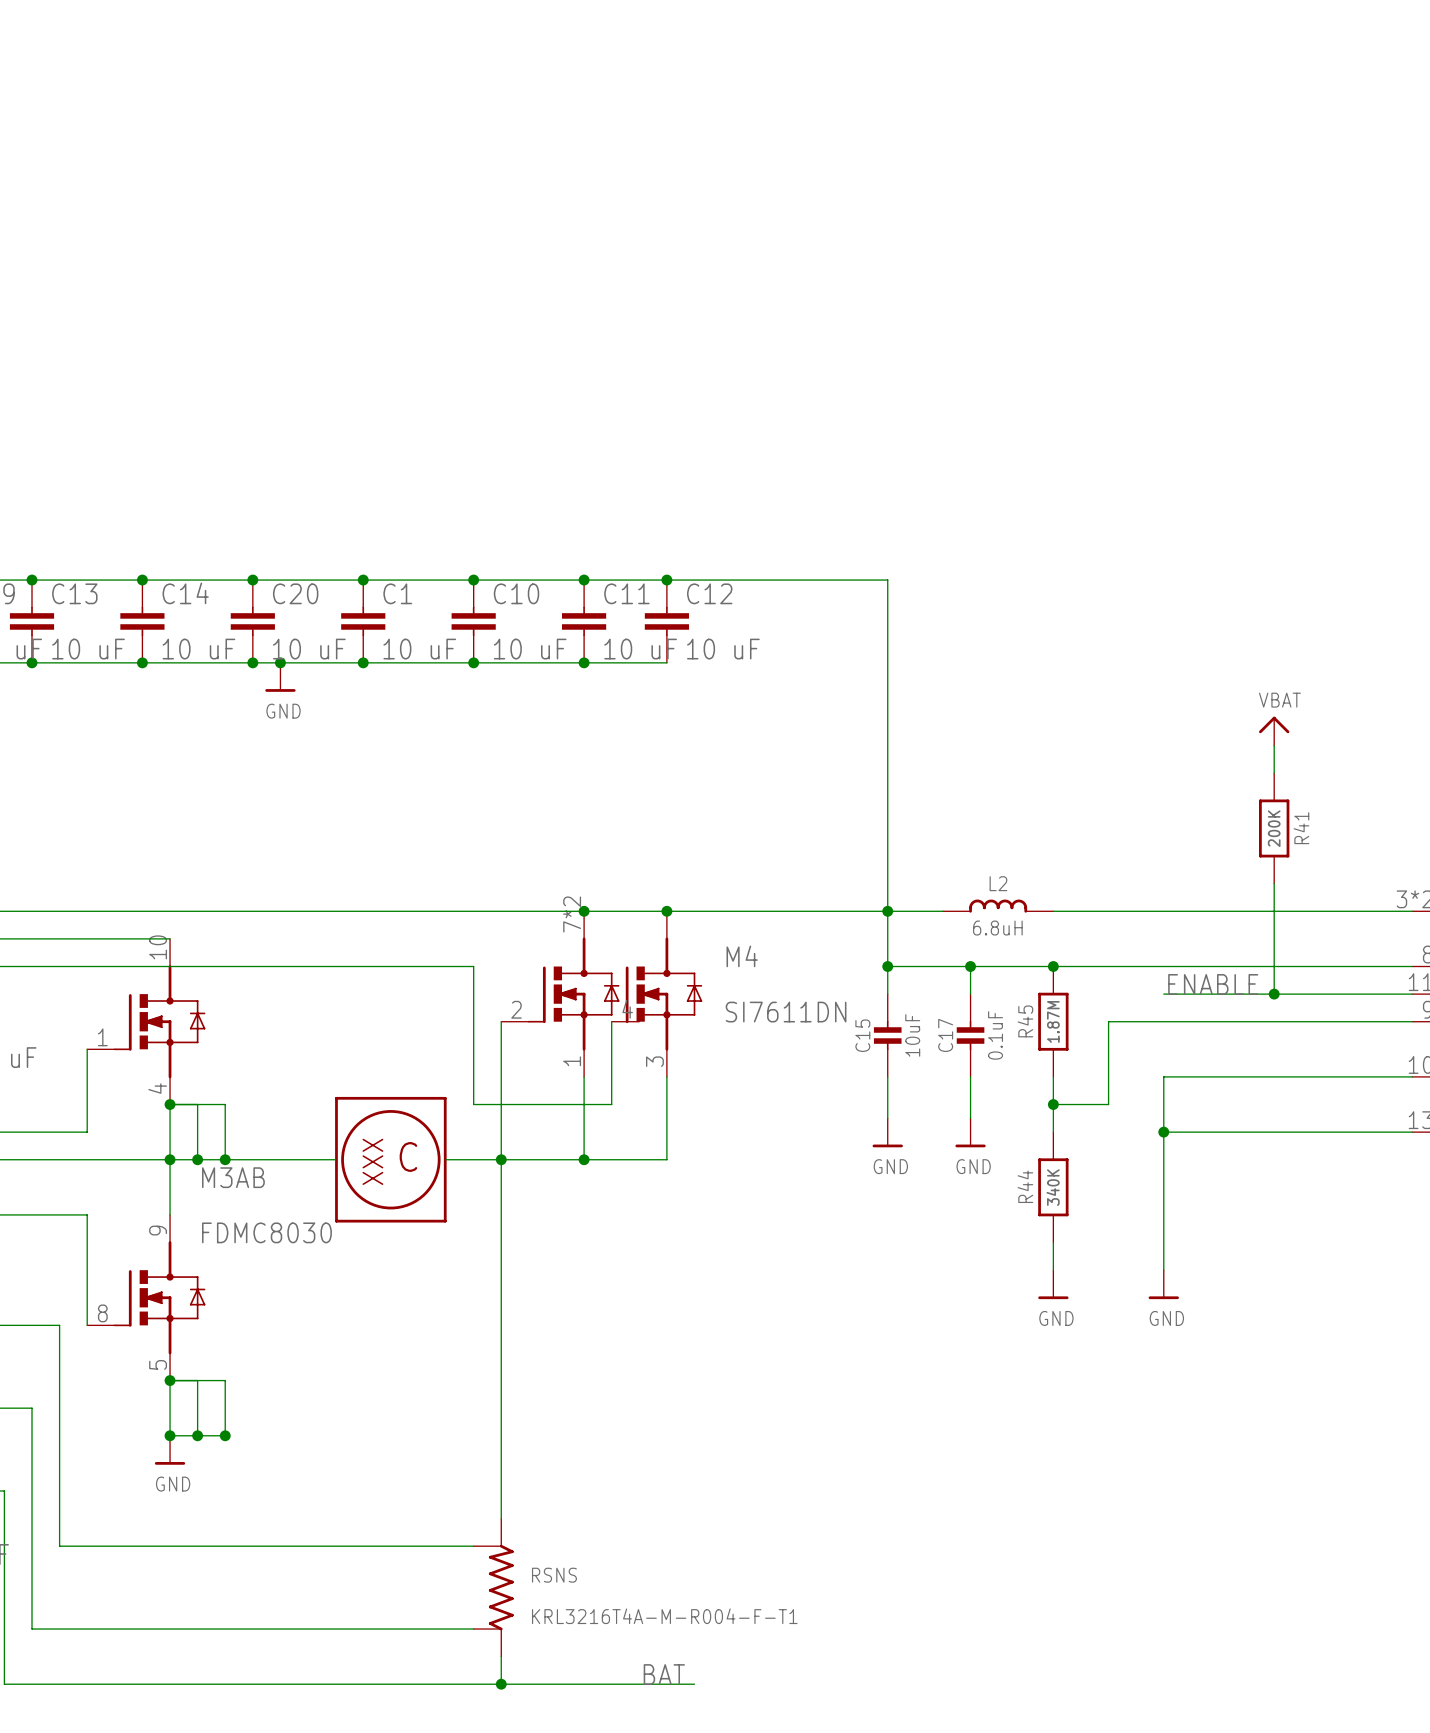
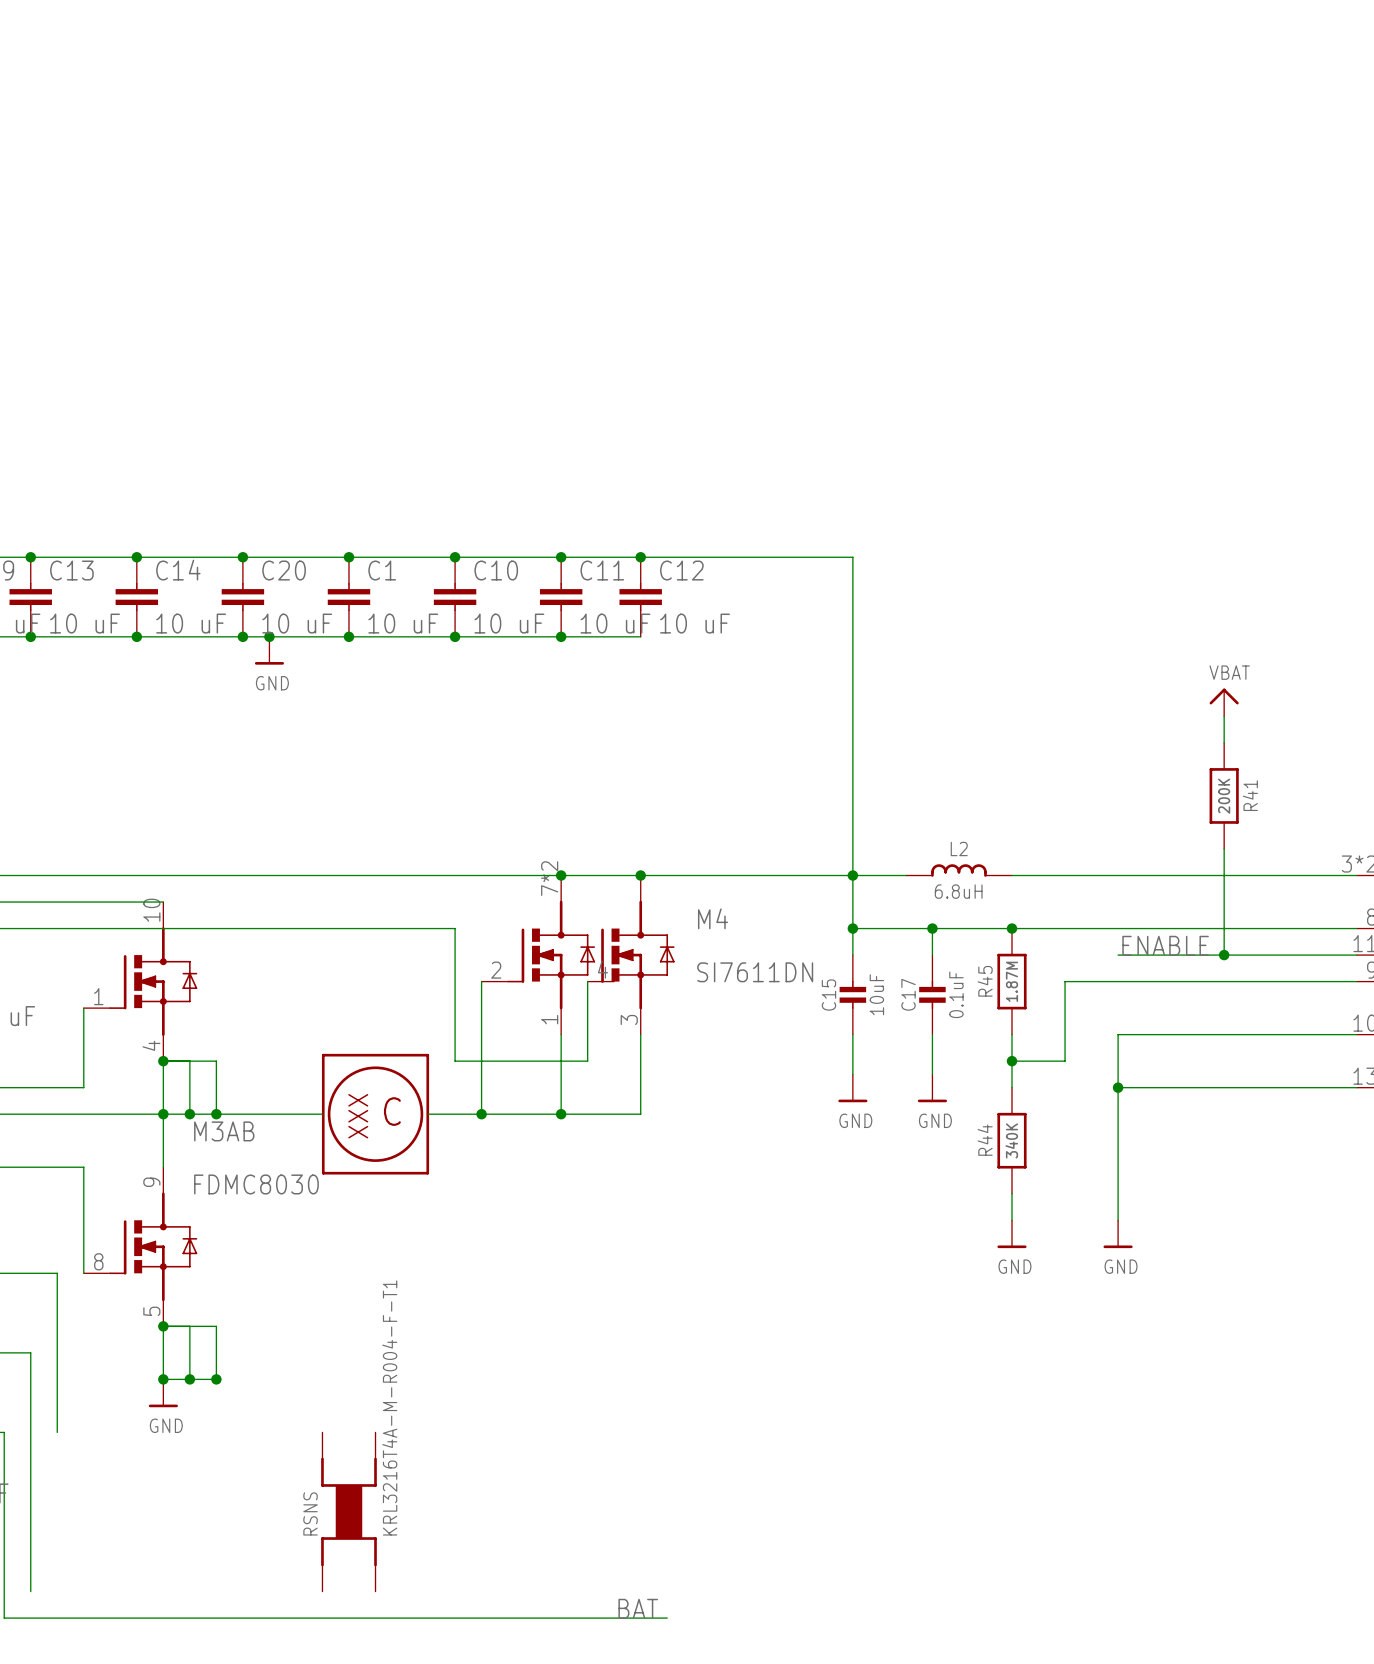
wire: (501, 1159) (501, 1518) -> none
wire: (59, 1490) (59, 1546) (473, 1546) -> none
RSNS: none -> KRL3216T4A-M-R004-F-T1 (348, 1511)
RSNS: KRL3216T4A-M-R004-F-T1 (493, 1587) -> none
wire: (32, 1629) (473, 1629) -> (30, 1565) (30, 1591)
wire: (501, 1656) (501, 1684) -> none
junction: (501, 1684) -> none

